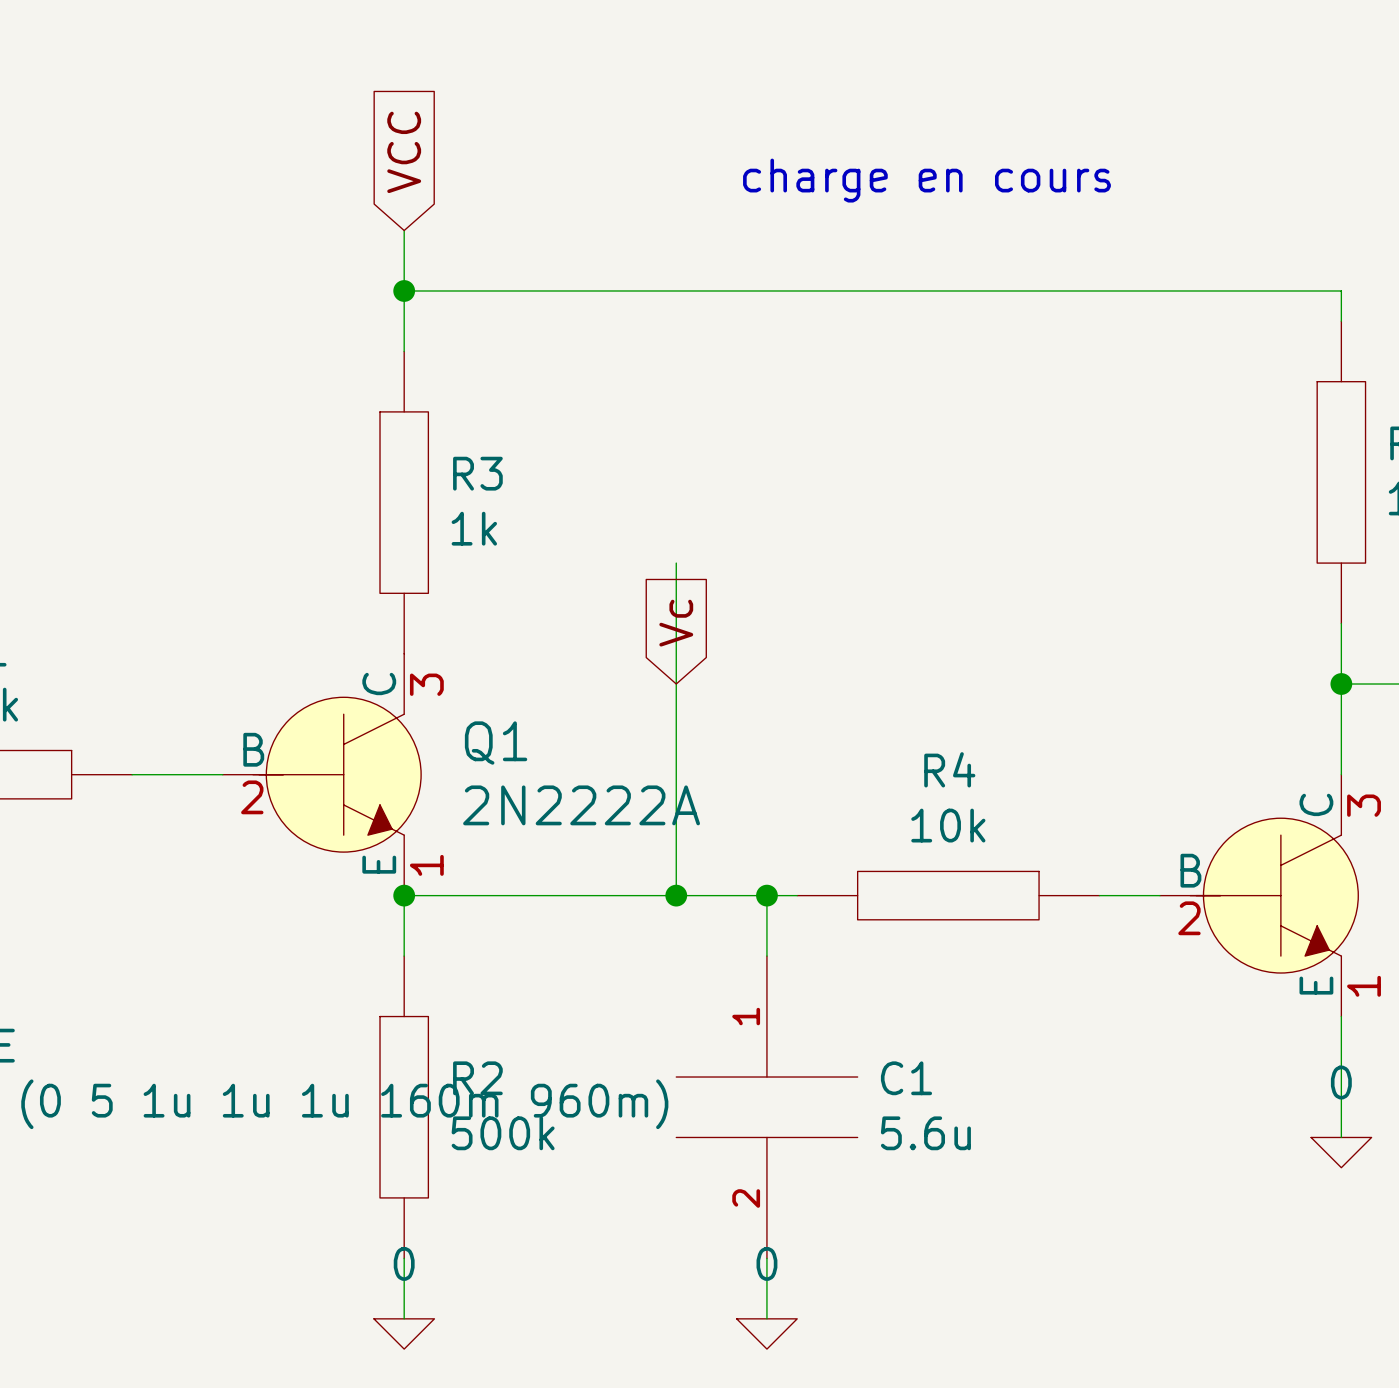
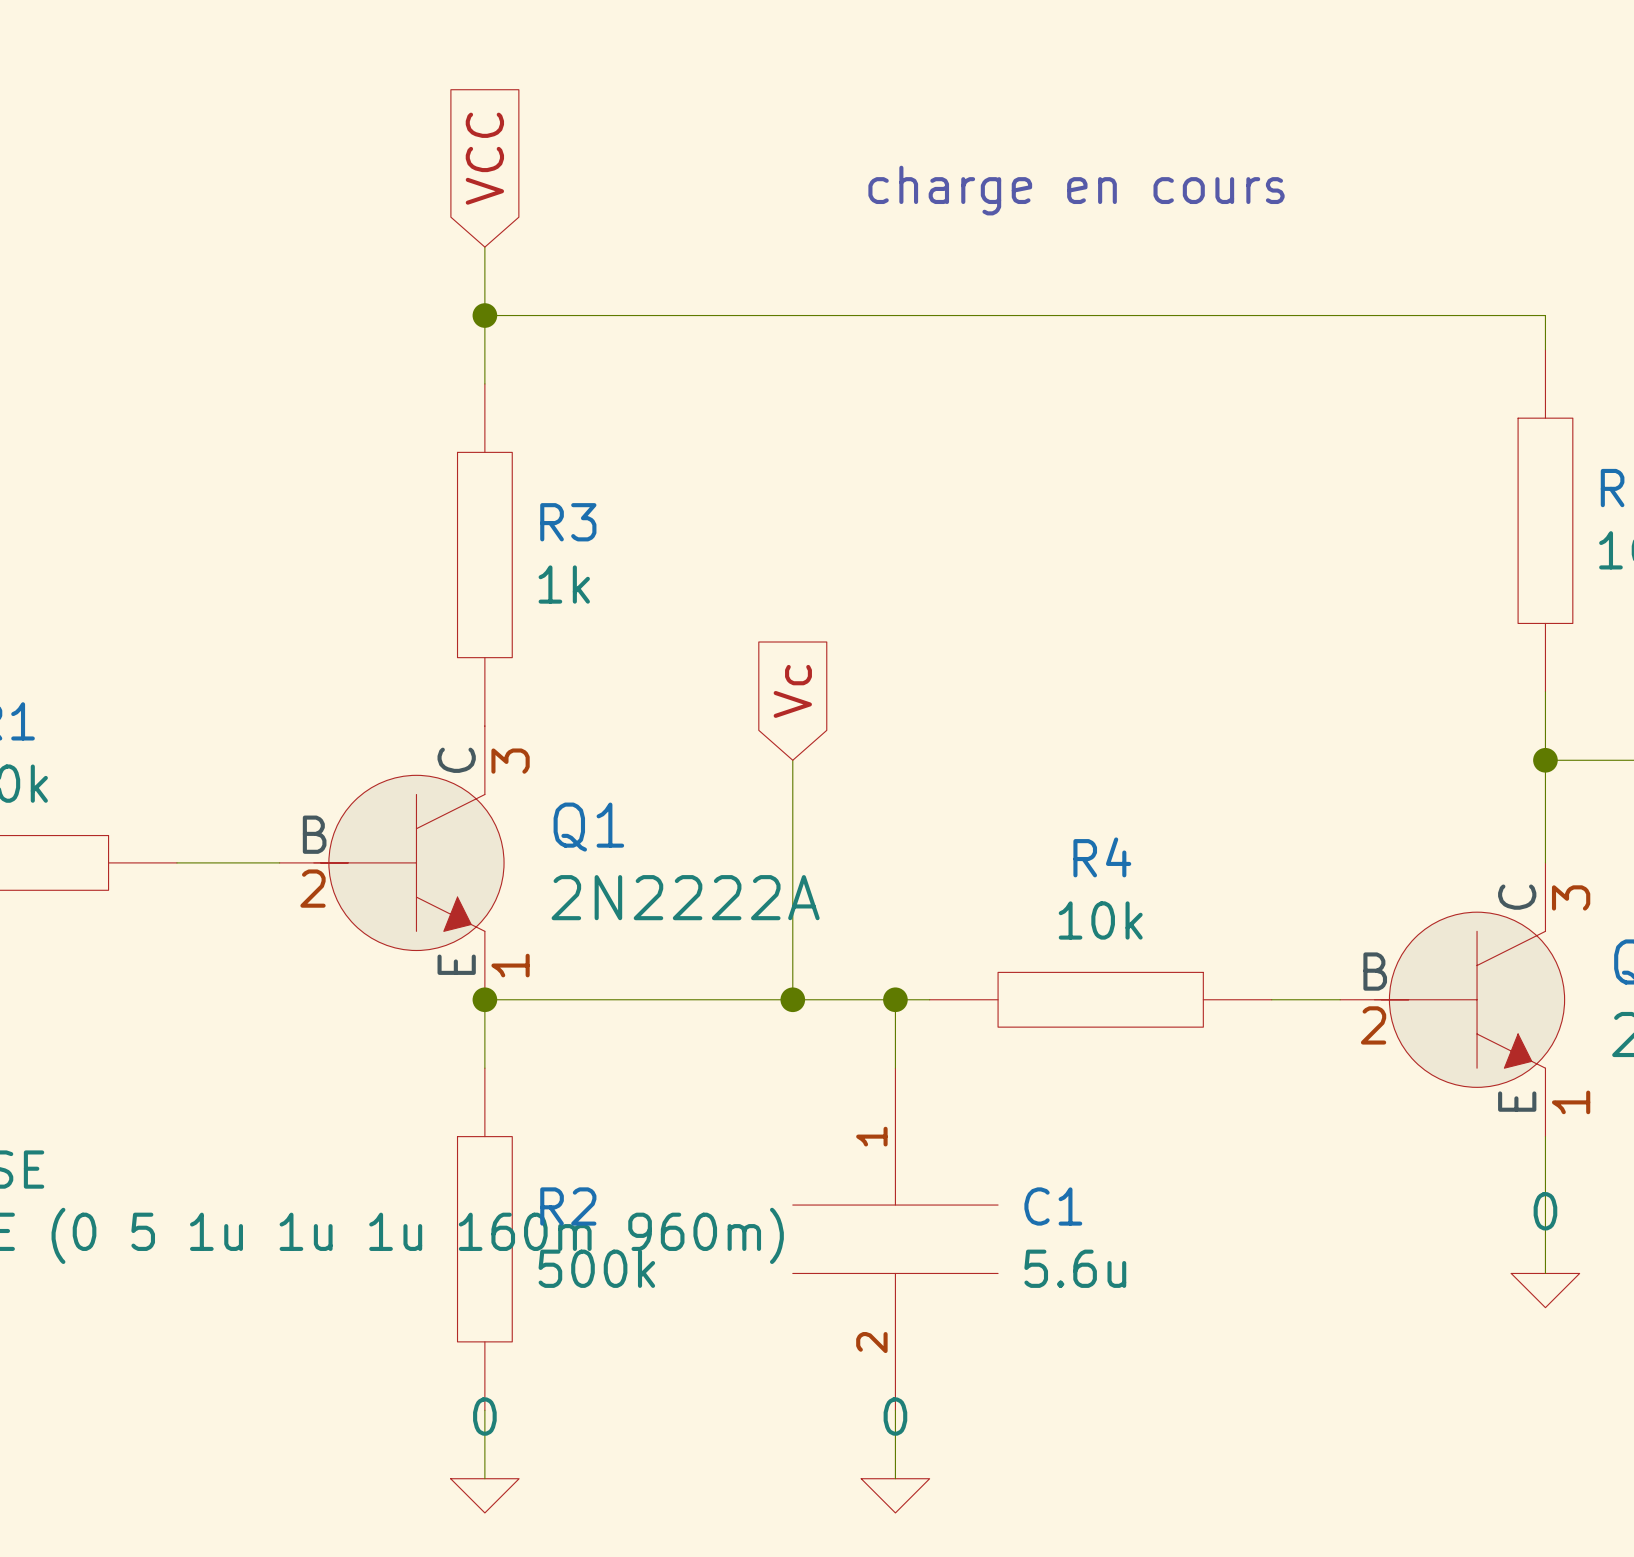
wire: (676, 563) (676, 684) -> none

